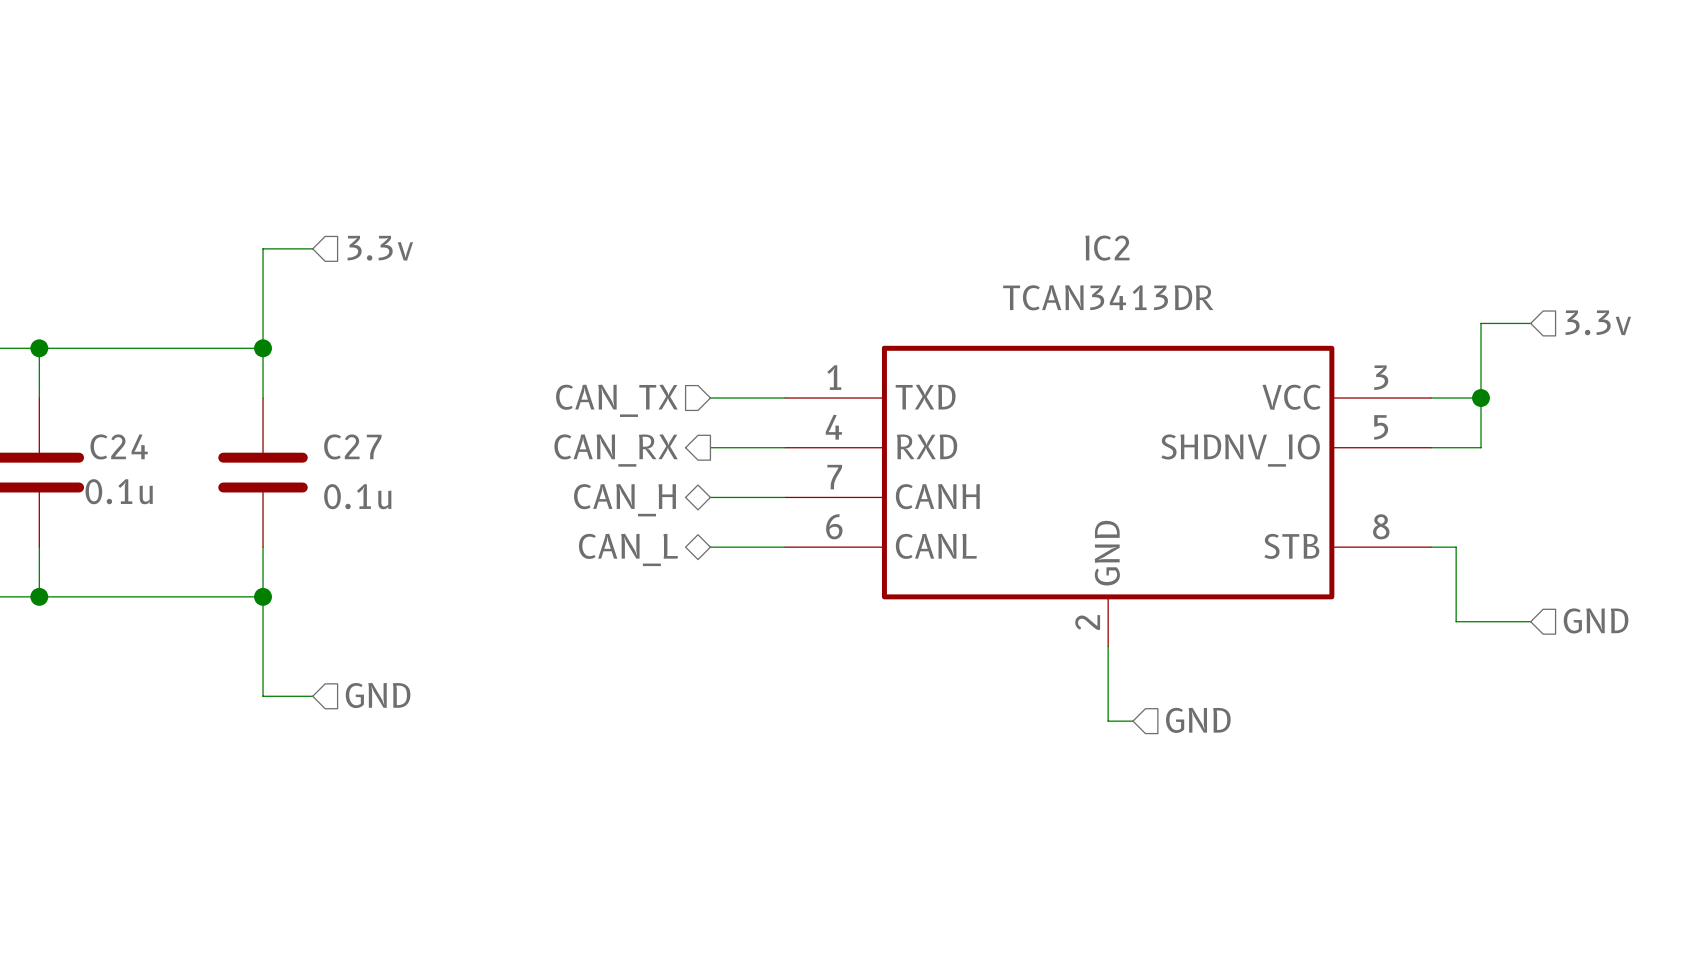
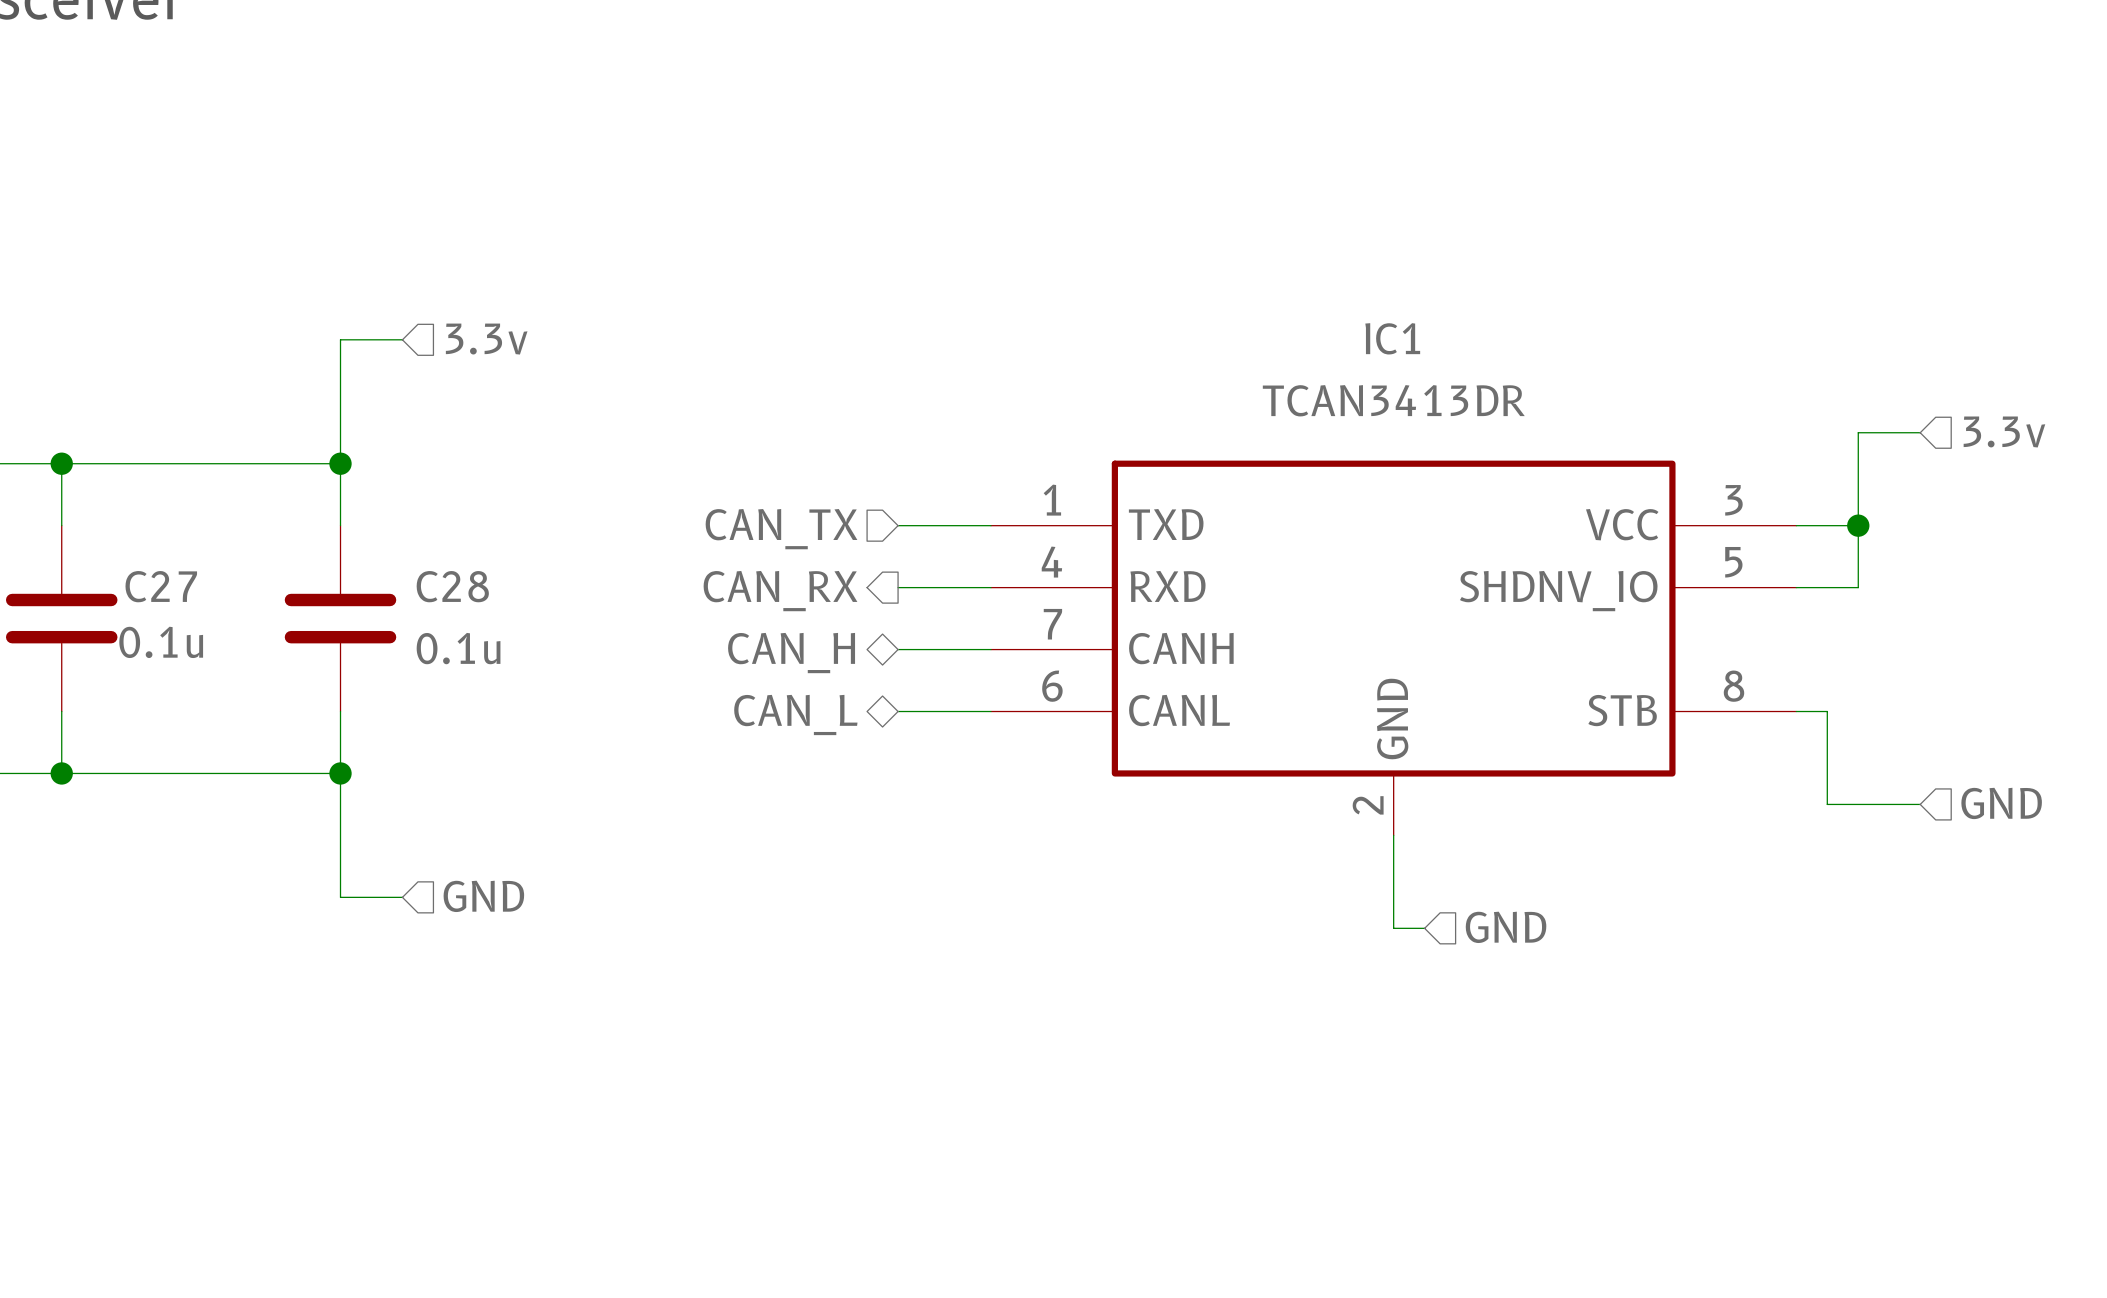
IC2 name: IC2 (1107, 248) -> IC1 (1392, 338)
C24 name: C24 (119, 446) -> C27 (161, 586)
C27 name: C27 (352, 446) -> C28 (452, 586)

